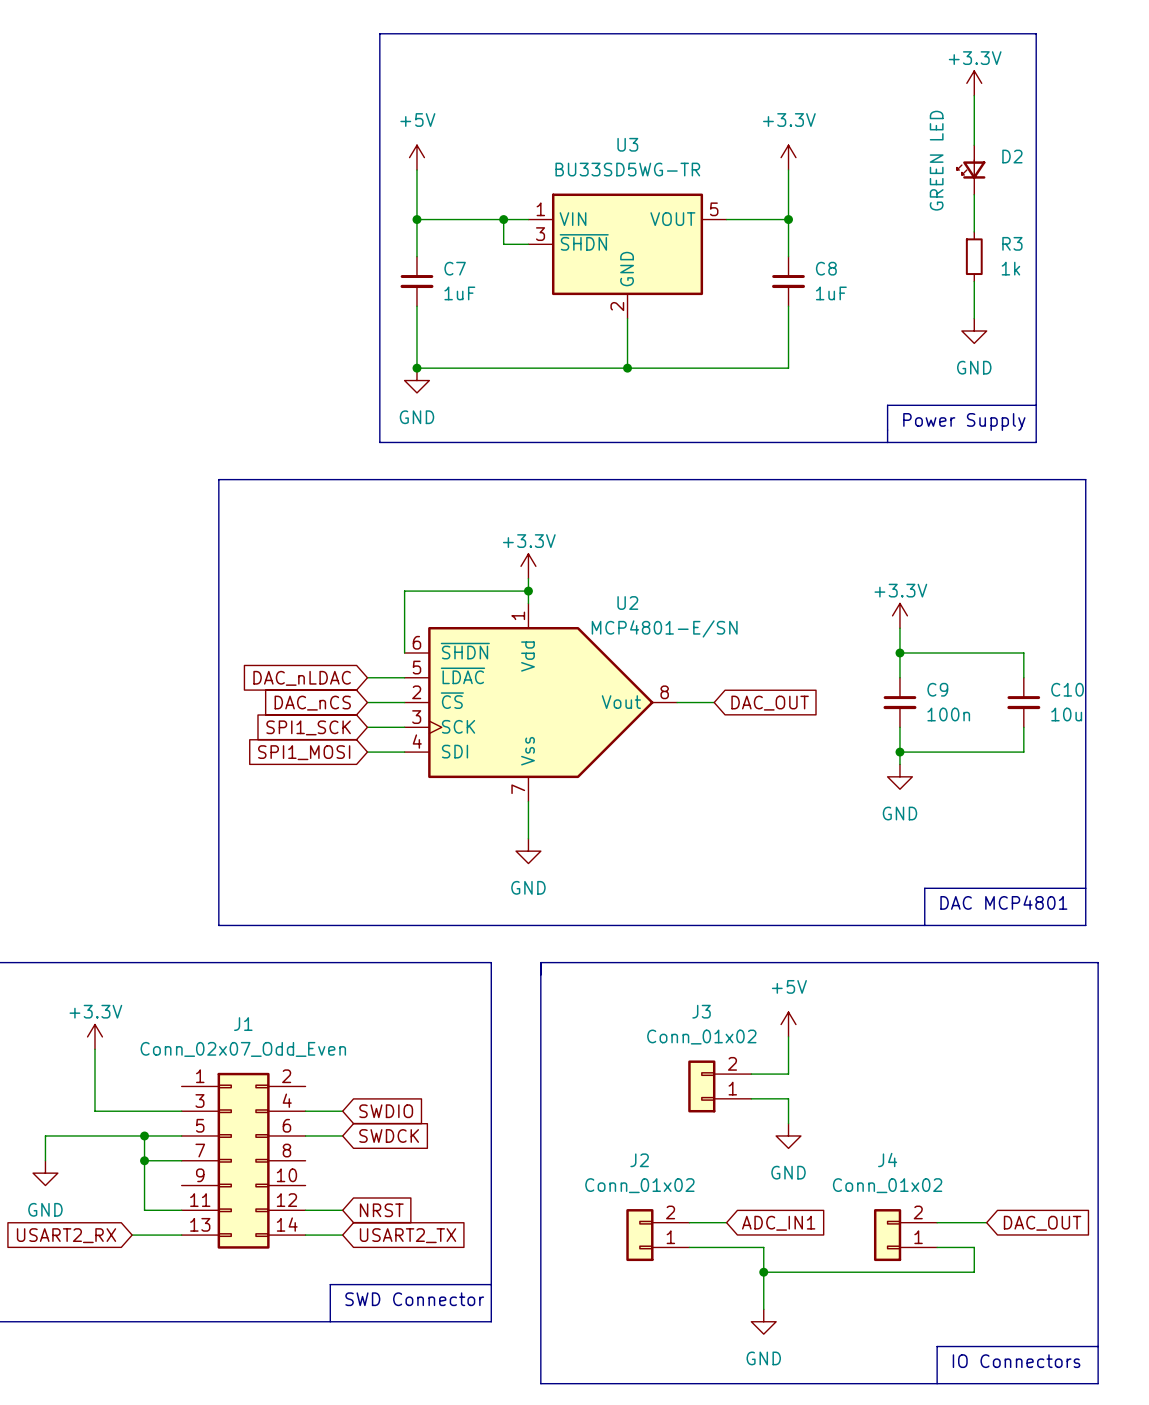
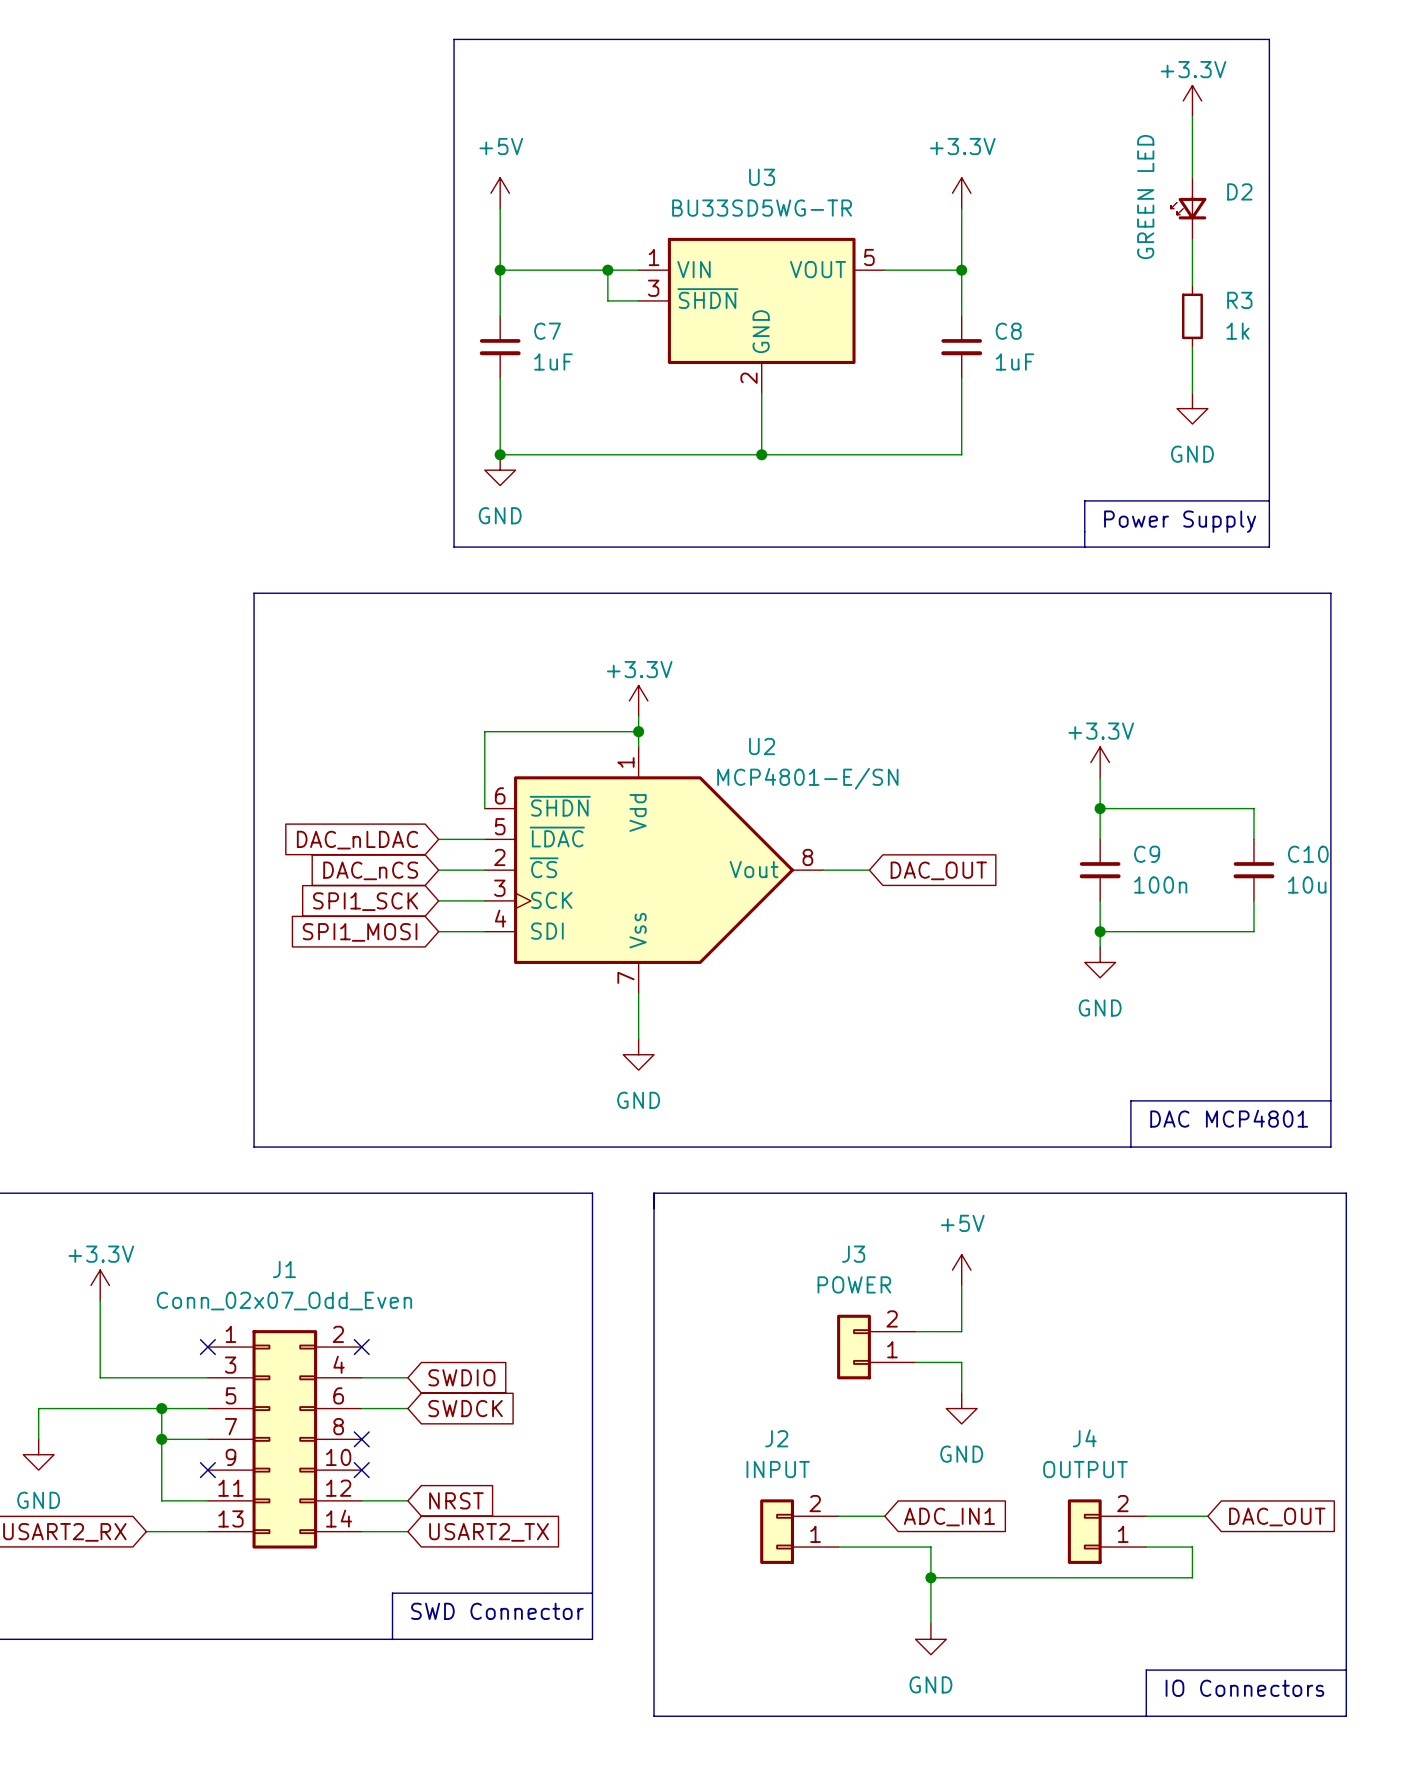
J3 value: Conn_01x02 (701, 1037) -> POWER (854, 1284)
no-connect mark: none -> (207, 1347)
no-connect mark: none -> (361, 1347)
no-connect mark: none -> (361, 1439)
no-connect mark: none -> (207, 1470)
no-connect mark: none -> (361, 1470)
J2 value: Conn_01x02 (639, 1185) -> INPUT (778, 1469)
J4 value: Conn_01x02 (887, 1185) -> OUTPUT (1085, 1469)

